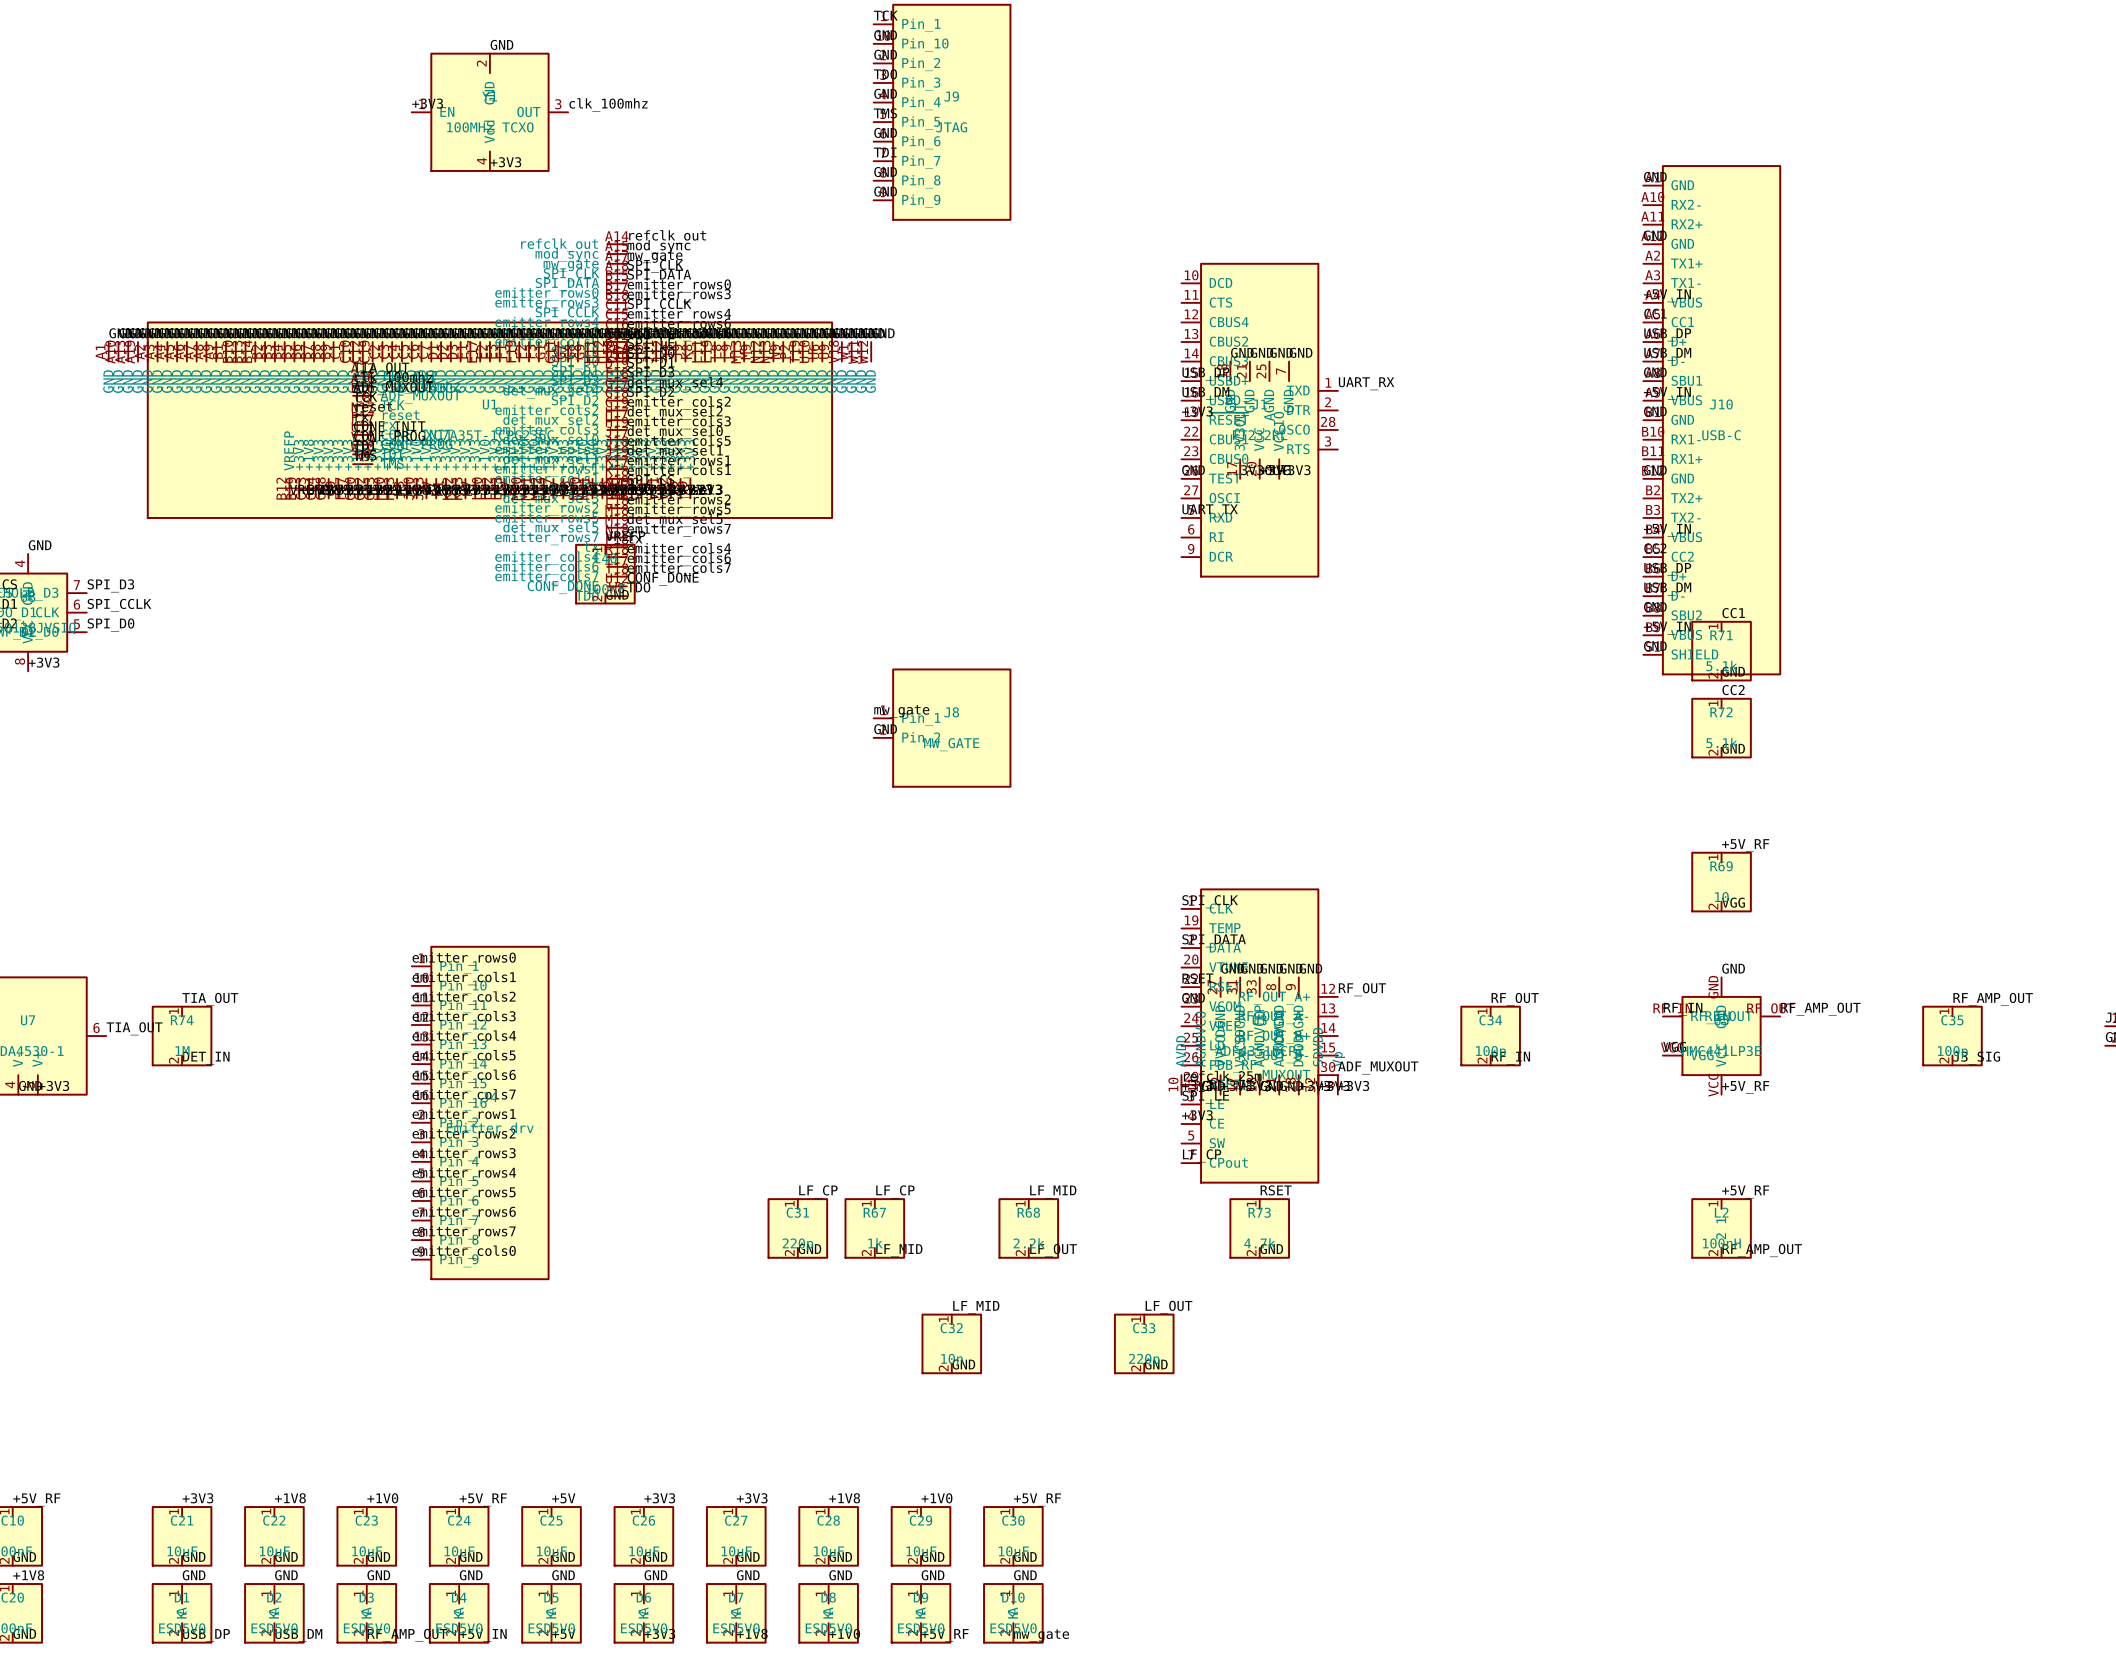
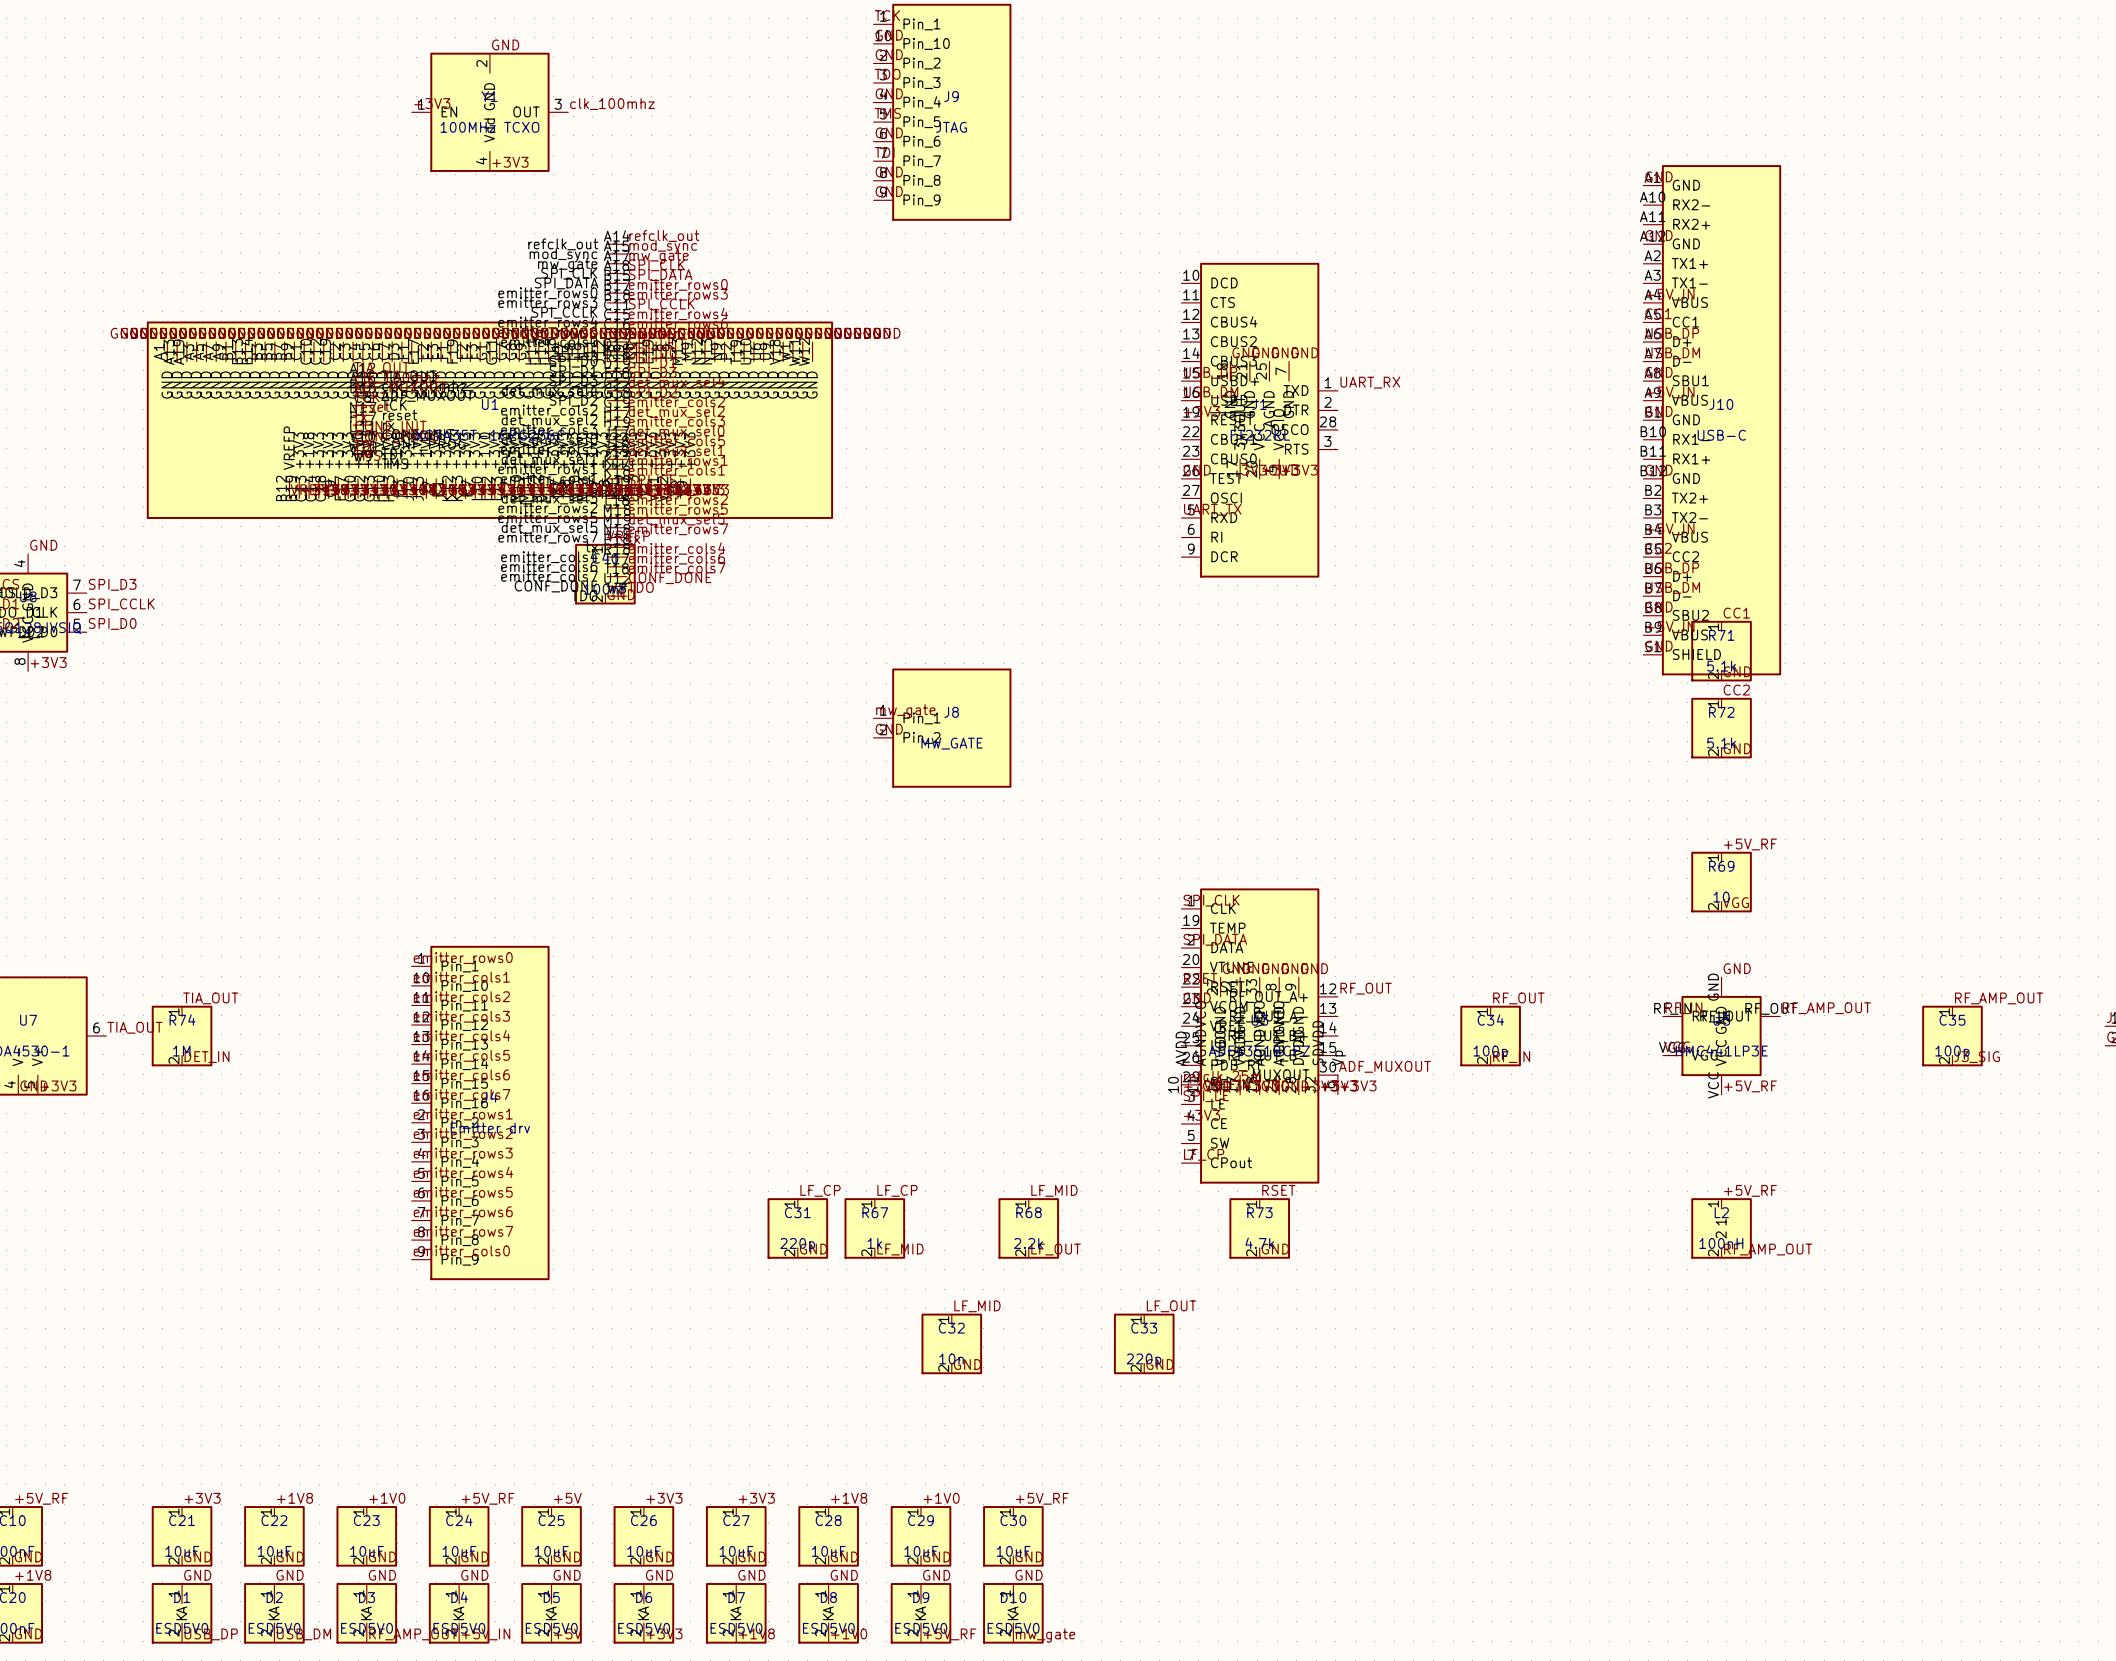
U1 symbol: [108, 244, 872, 597] -> [146, 244, 834, 597]

